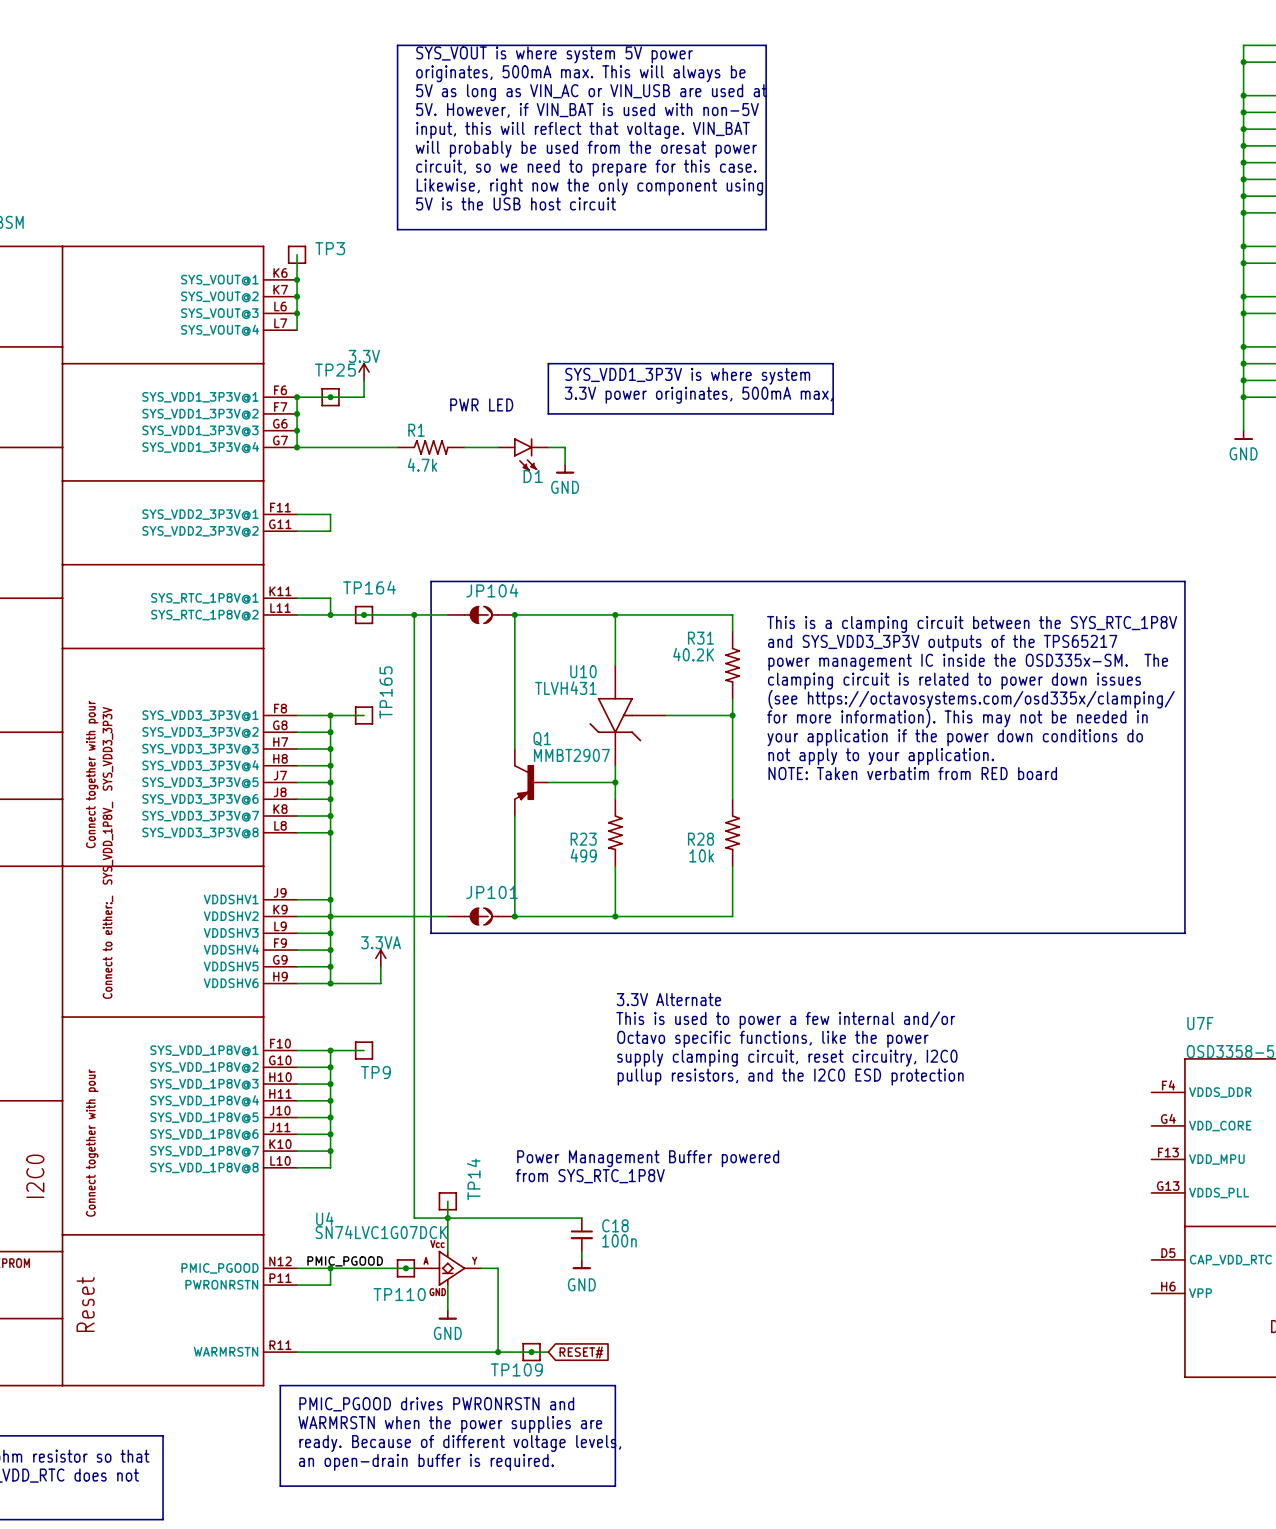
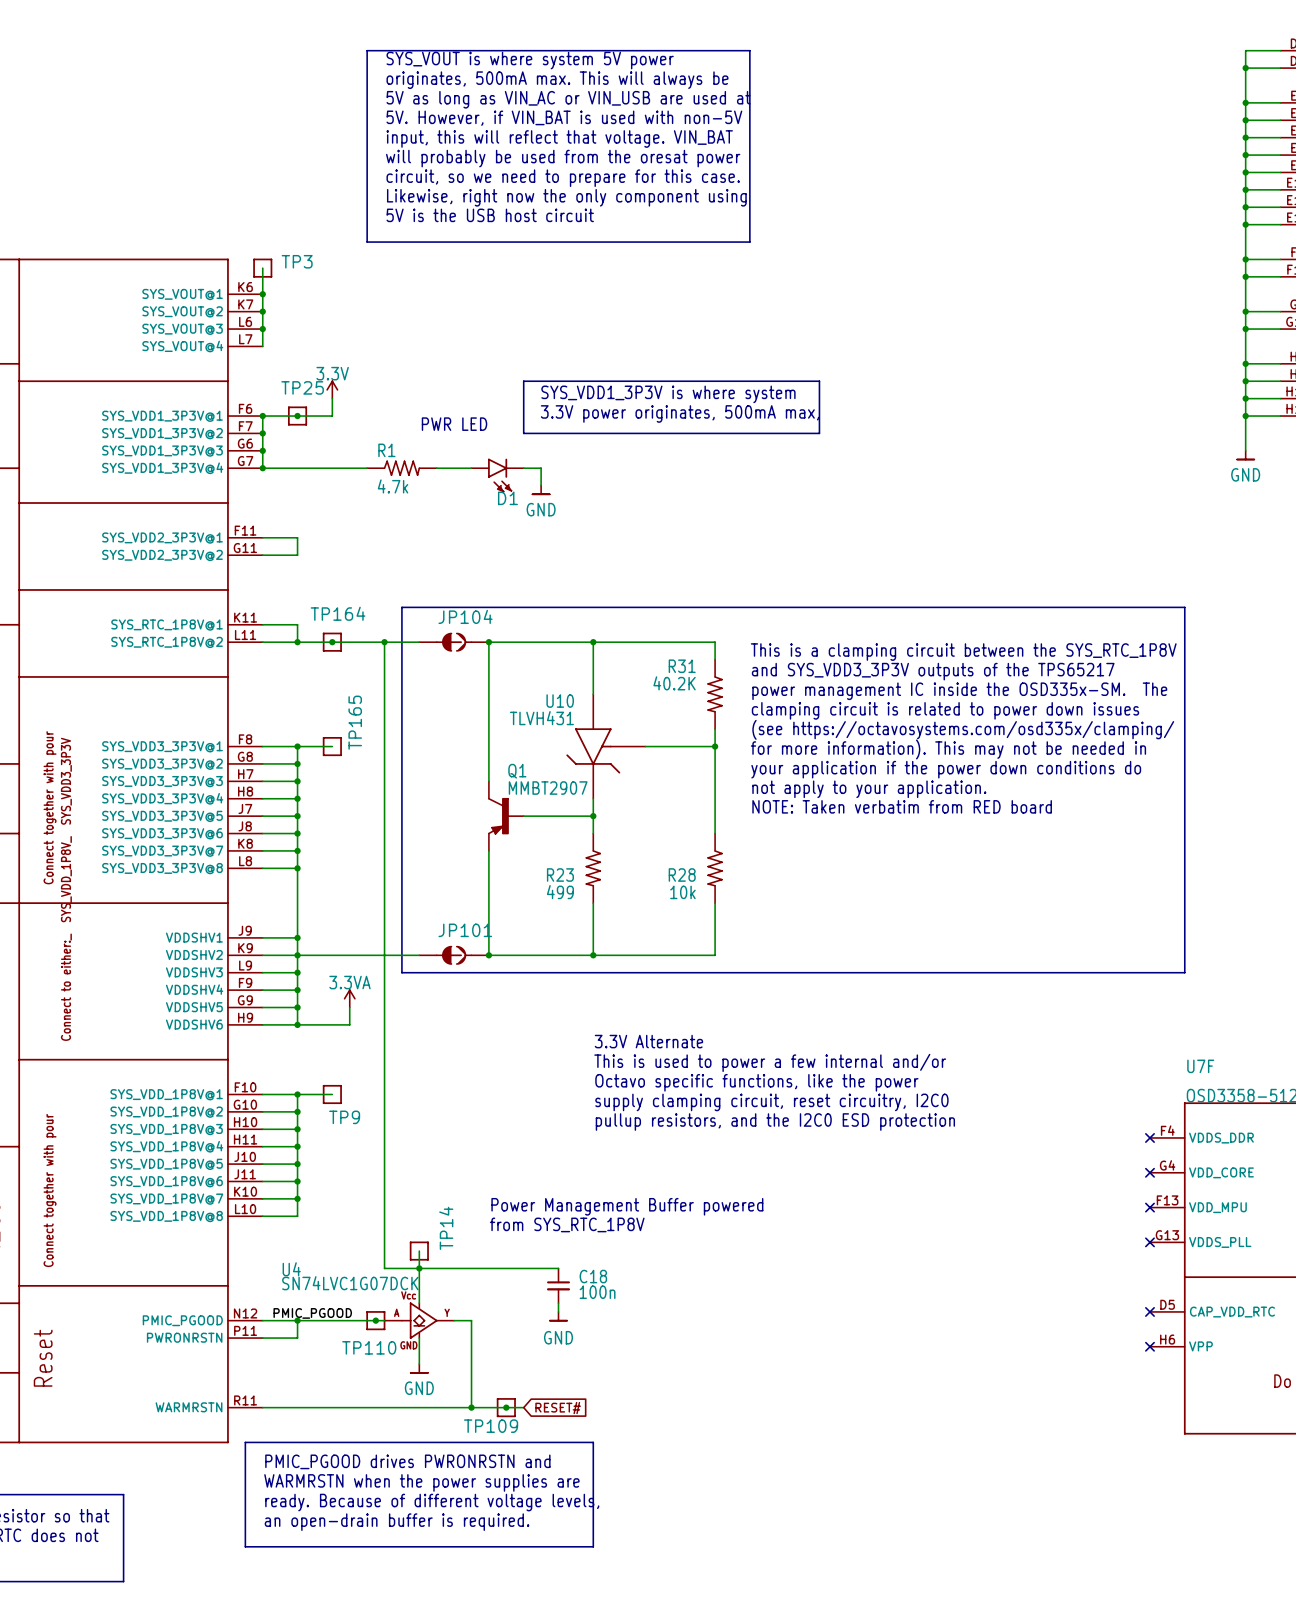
no-connect mark: none -> (1149, 1137)
no-connect mark: none -> (1149, 1172)
no-connect mark: none -> (1149, 1207)
no-connect mark: none -> (1149, 1242)
no-connect mark: none -> (1149, 1311)
no-connect mark: none -> (1149, 1346)

